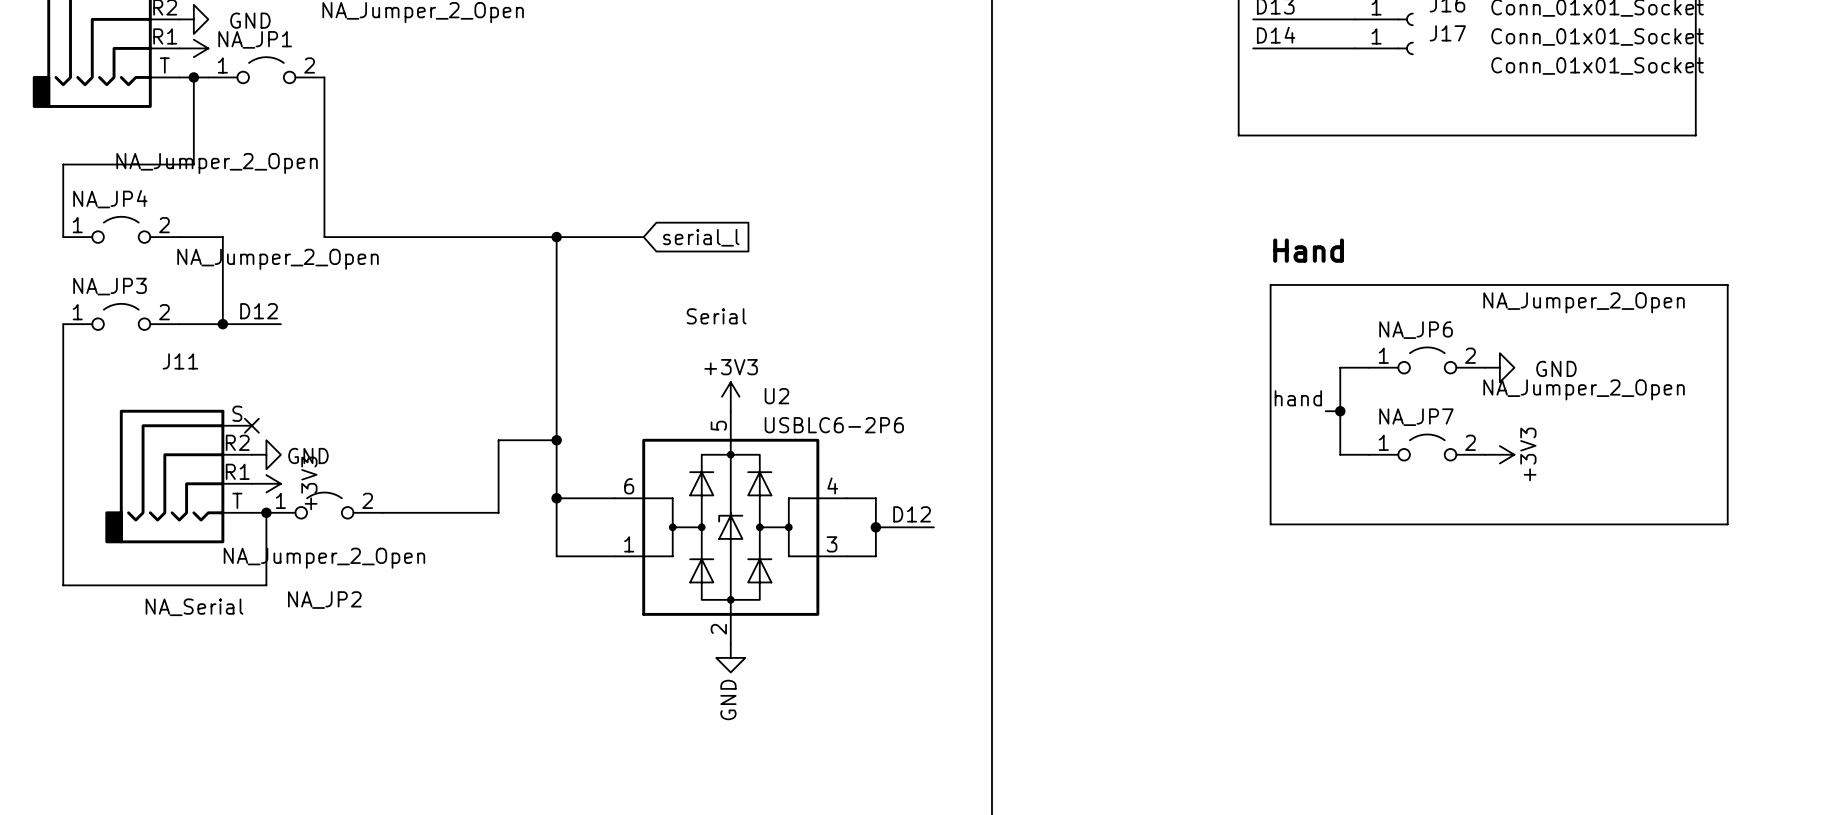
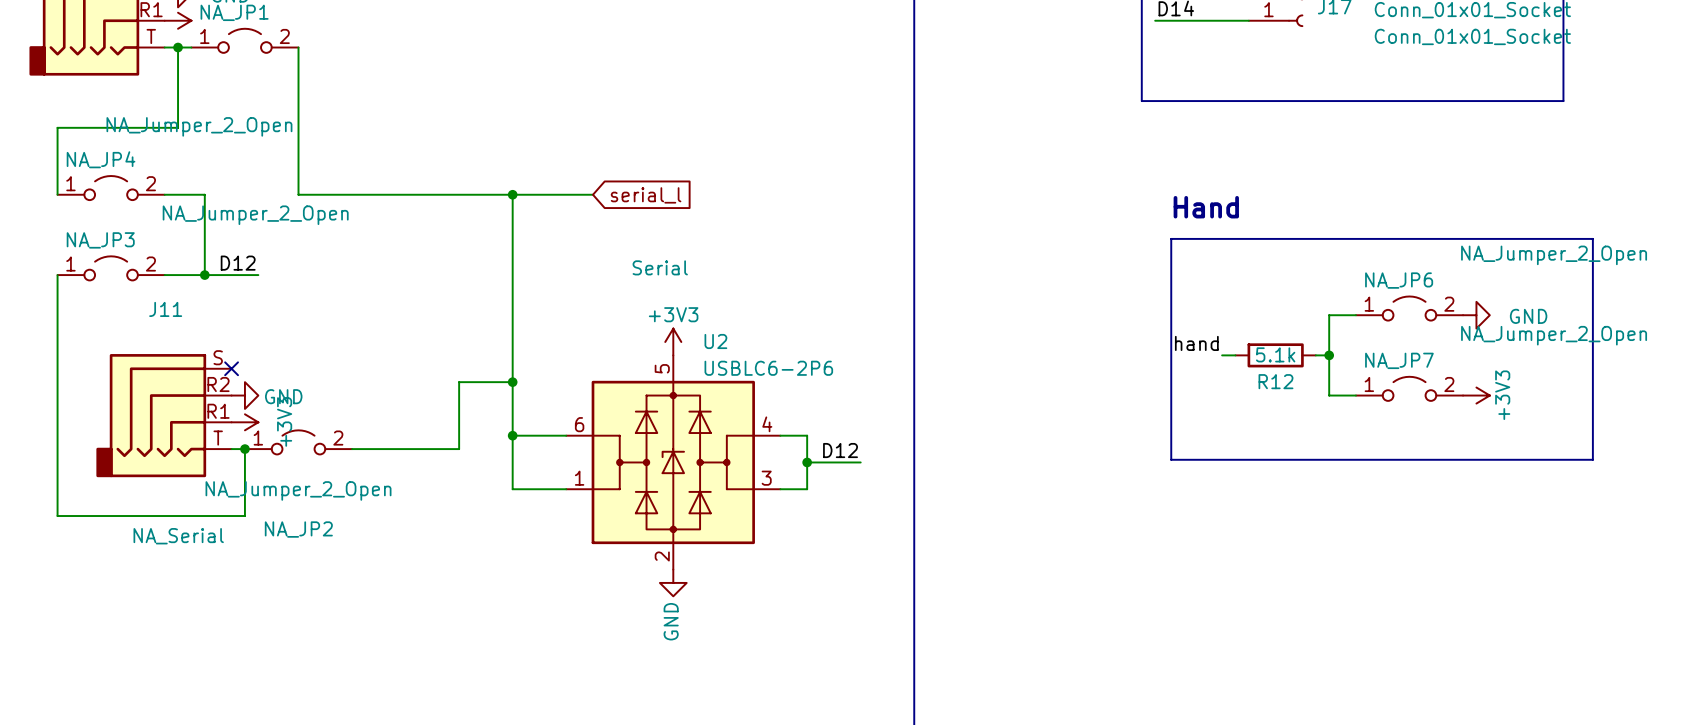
NA_JP6 position: (1427, 360) -> (1409, 308)
wire: (1369, 367) (1340, 367) (1340, 454) (1369, 454) -> (1355, 315) (1329, 315) (1329, 395) (1355, 395)
power symbol position: GND (1499, 367) -> GND (1476, 315)
junction: (1340, 411) -> none
R12: none -> 5.1k (1275, 355)
wire: none -> (1315, 355) (1329, 355)
junction: none -> (1329, 355)
NA_JP7 position: (1427, 447) -> (1409, 388)
power symbol position: +3V3 (1499, 454) -> +3V3 (1476, 395)

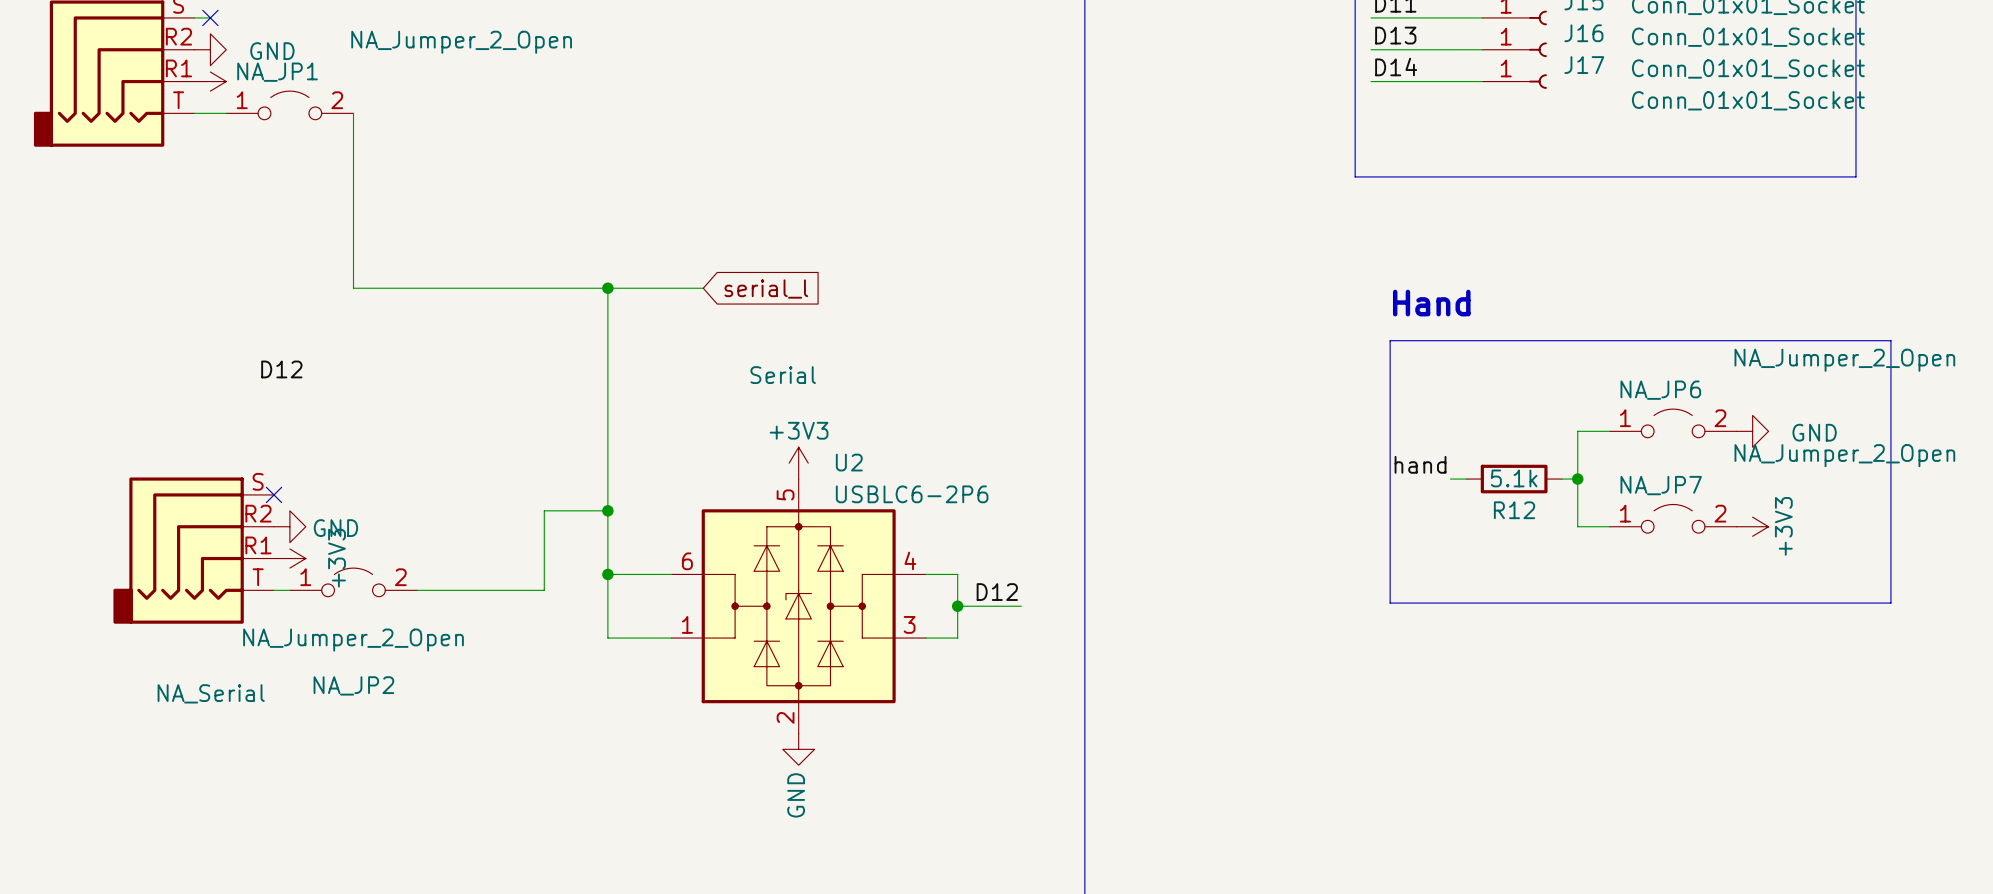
wire: (178, 47) (178, 127) (57, 127) (57, 194) -> none
junction: (178, 47) -> none
NA_JP4: NA_Jumper_2_Open (111, 188) -> none
wire: (164, 194) (204, 194) (204, 275) -> none
NA_JP3: NA_Jumper_2_Open (111, 268) -> none
wire: (57, 275) (57, 516) (244, 516) (244, 449) -> none
wire: (164, 275) (258, 275) -> none
junction: (204, 275) -> none
J11 name: J11 (165, 309) -> none
junction: (244, 449) -> none

